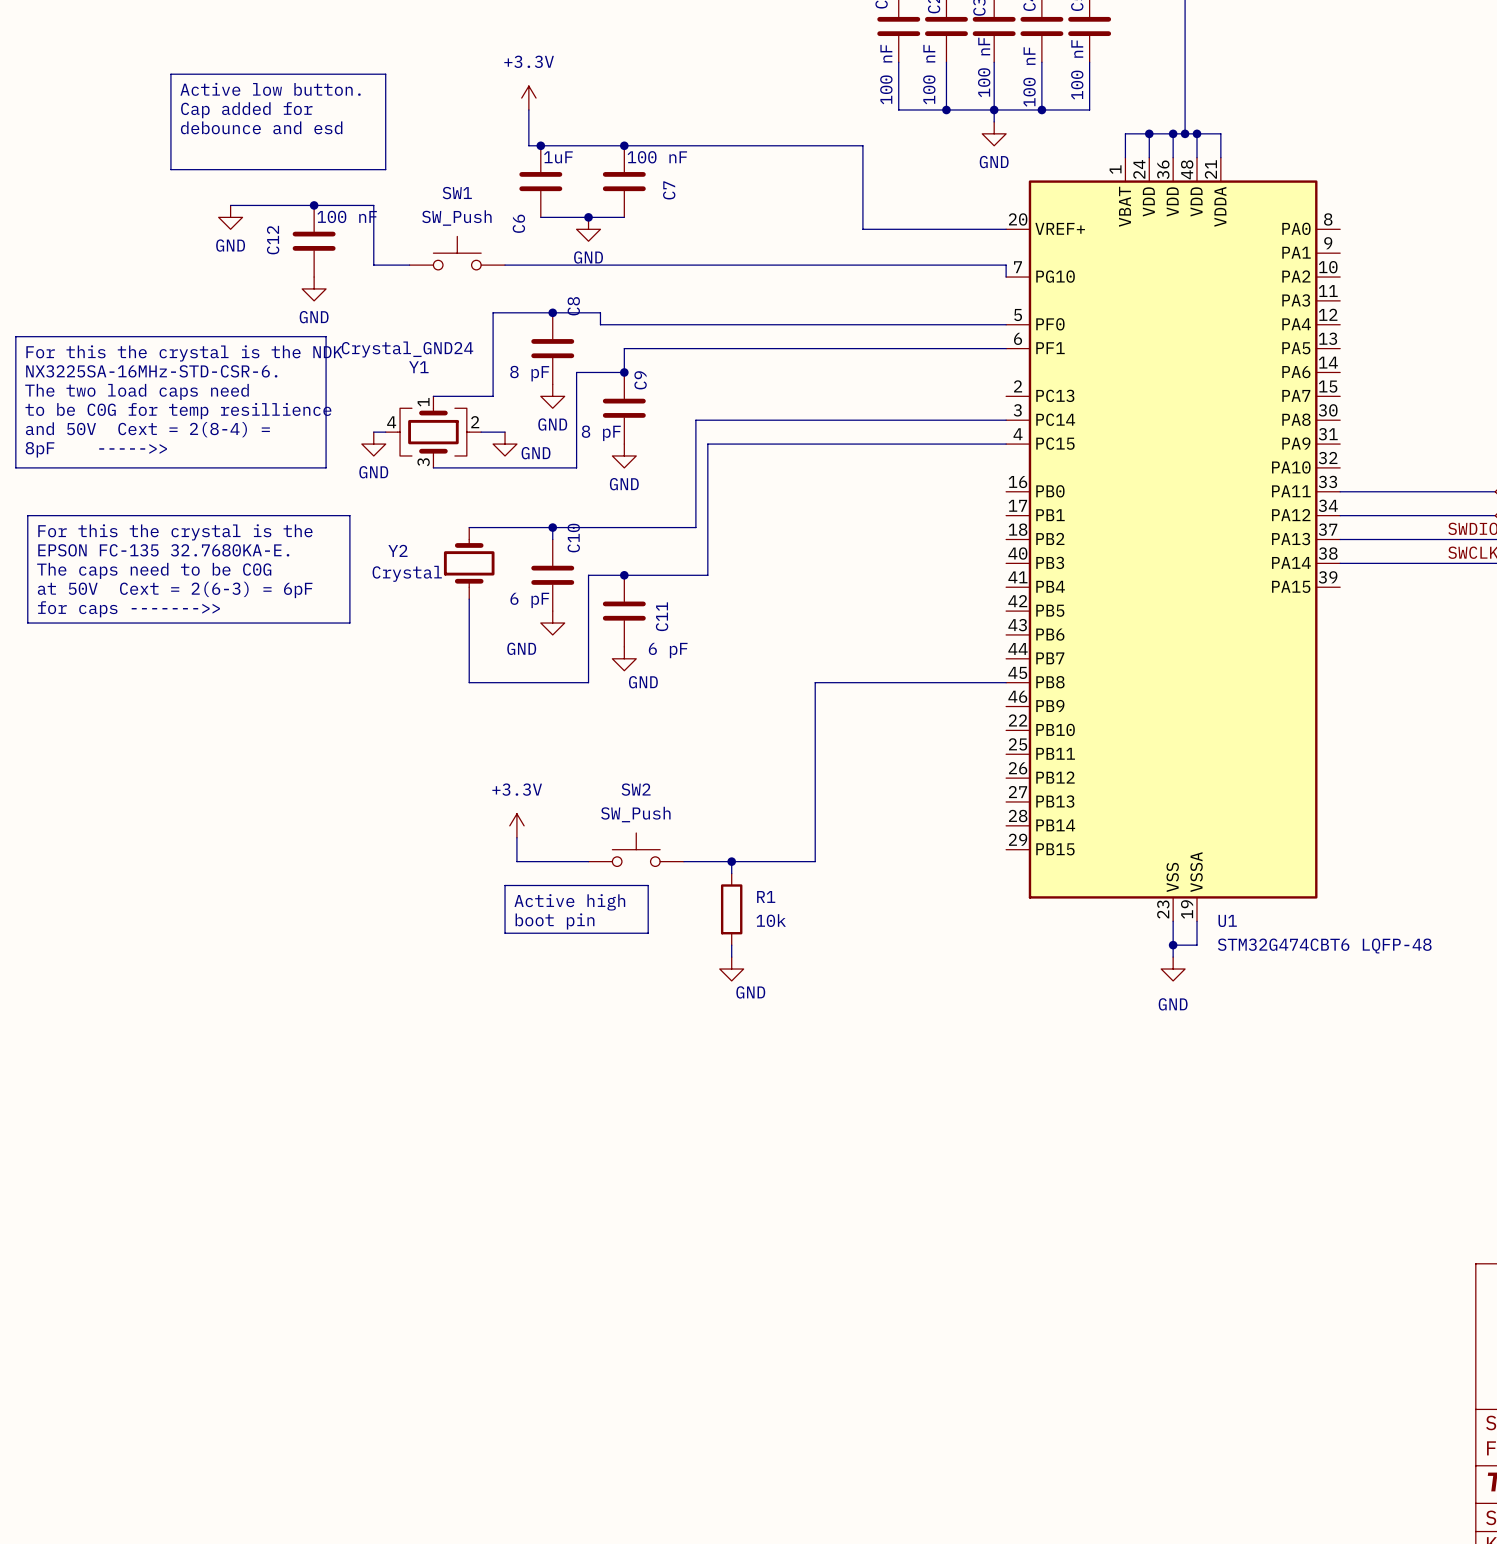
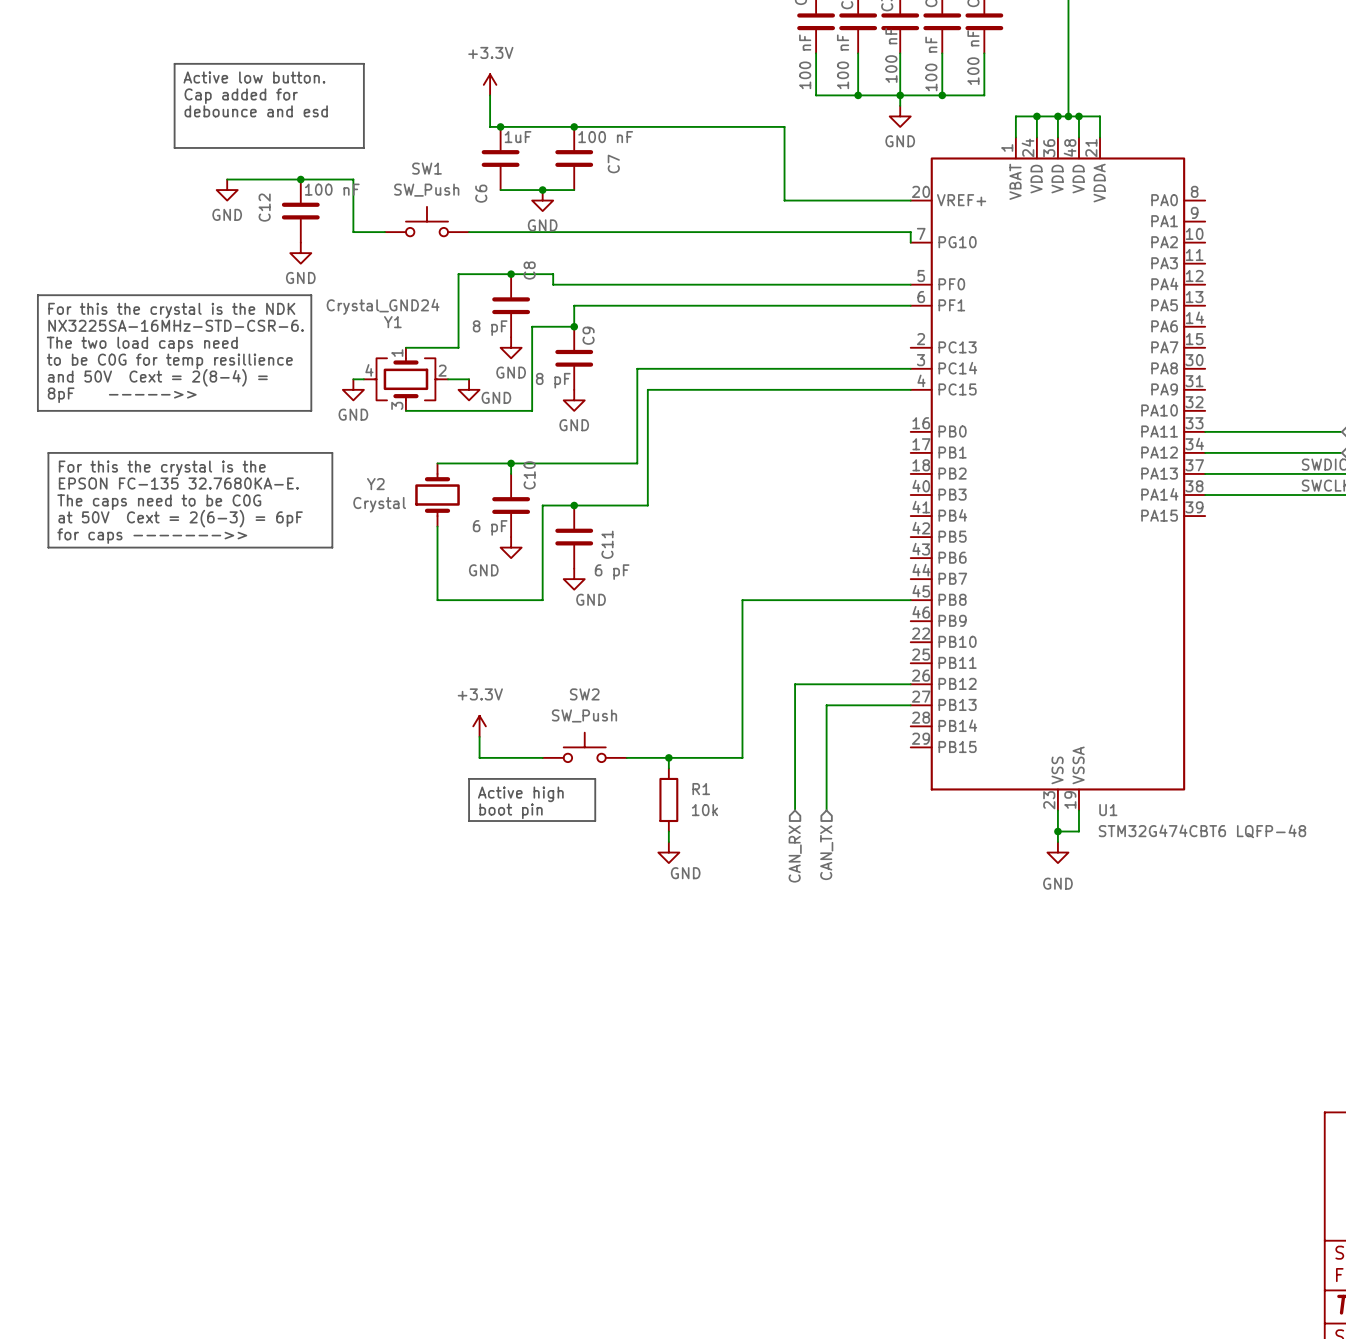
wire: none -> (910, 684) (795, 684) (795, 810)
wire: none -> (910, 705) (826, 705) (826, 810)
hierarchical label: none -> CAN_RX (795, 853)
hierarchical label: none -> CAN_TX (826, 852)

